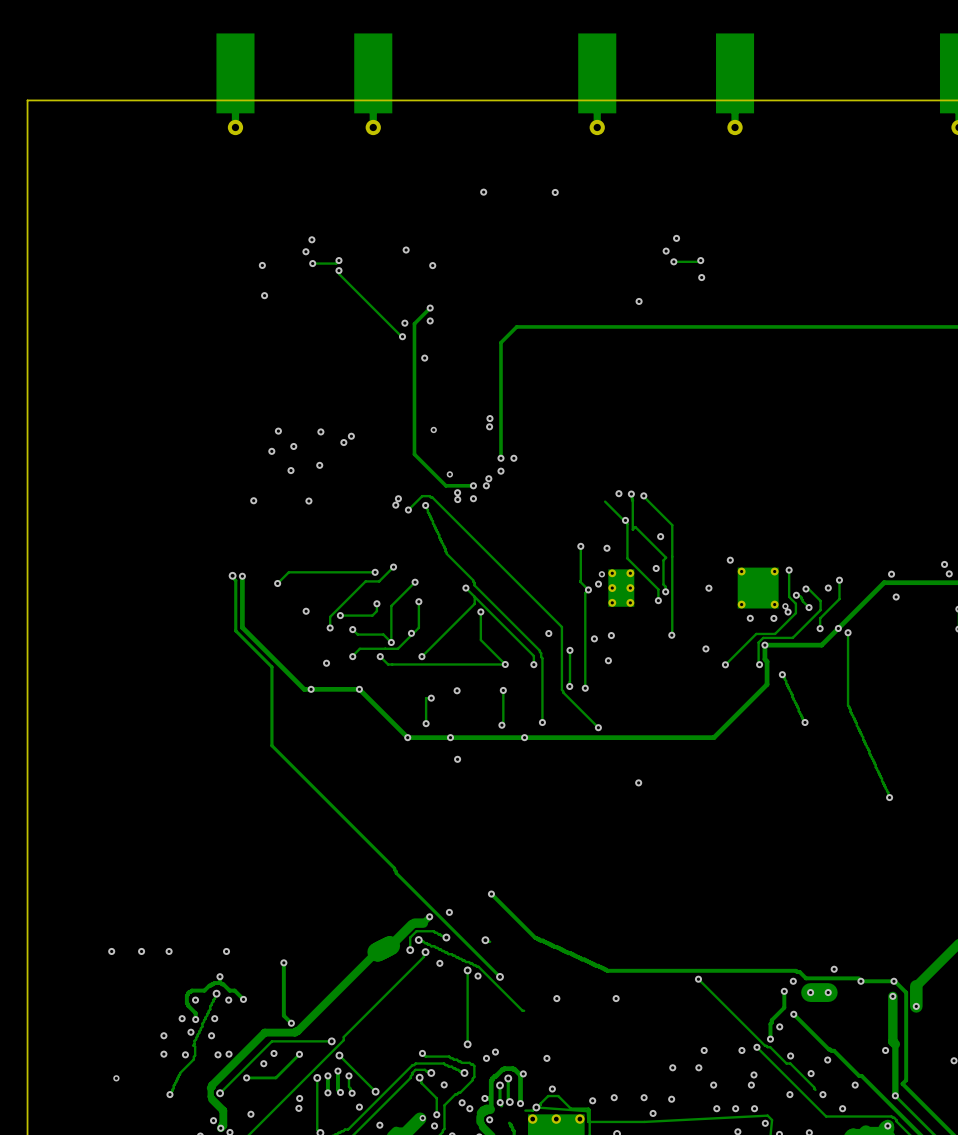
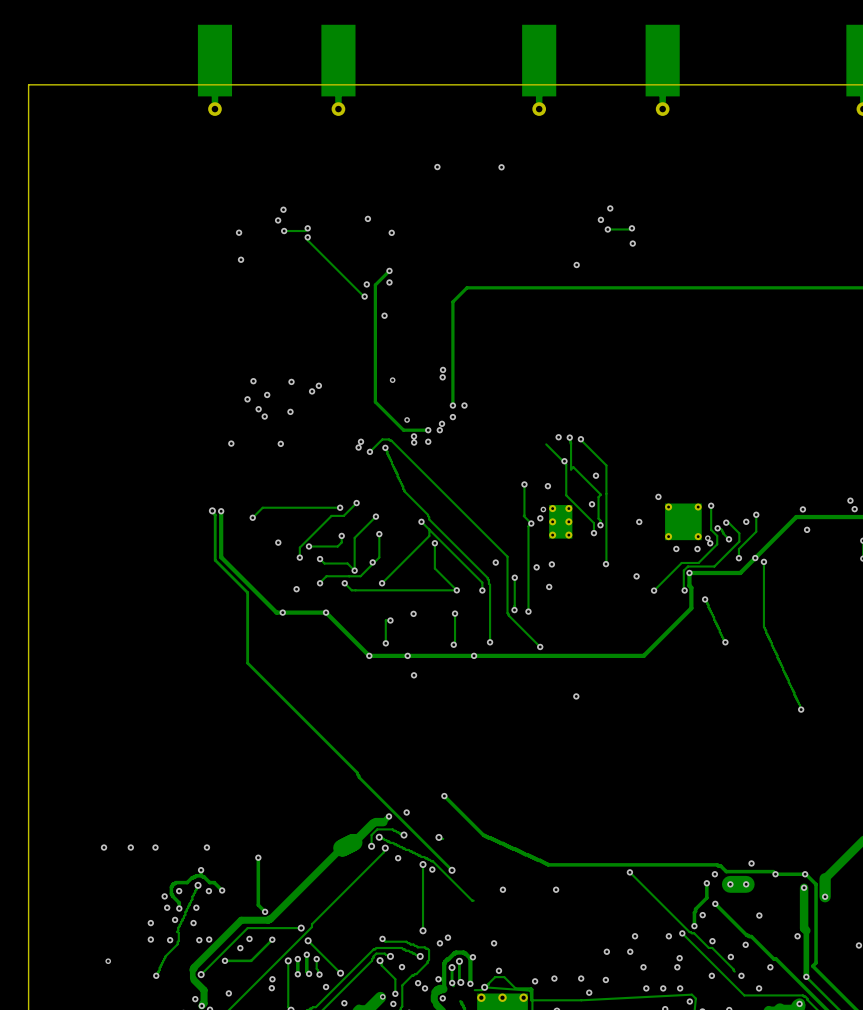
via: none -> (258, 409)
via: none -> (164, 896)
via: none -> (759, 915)

